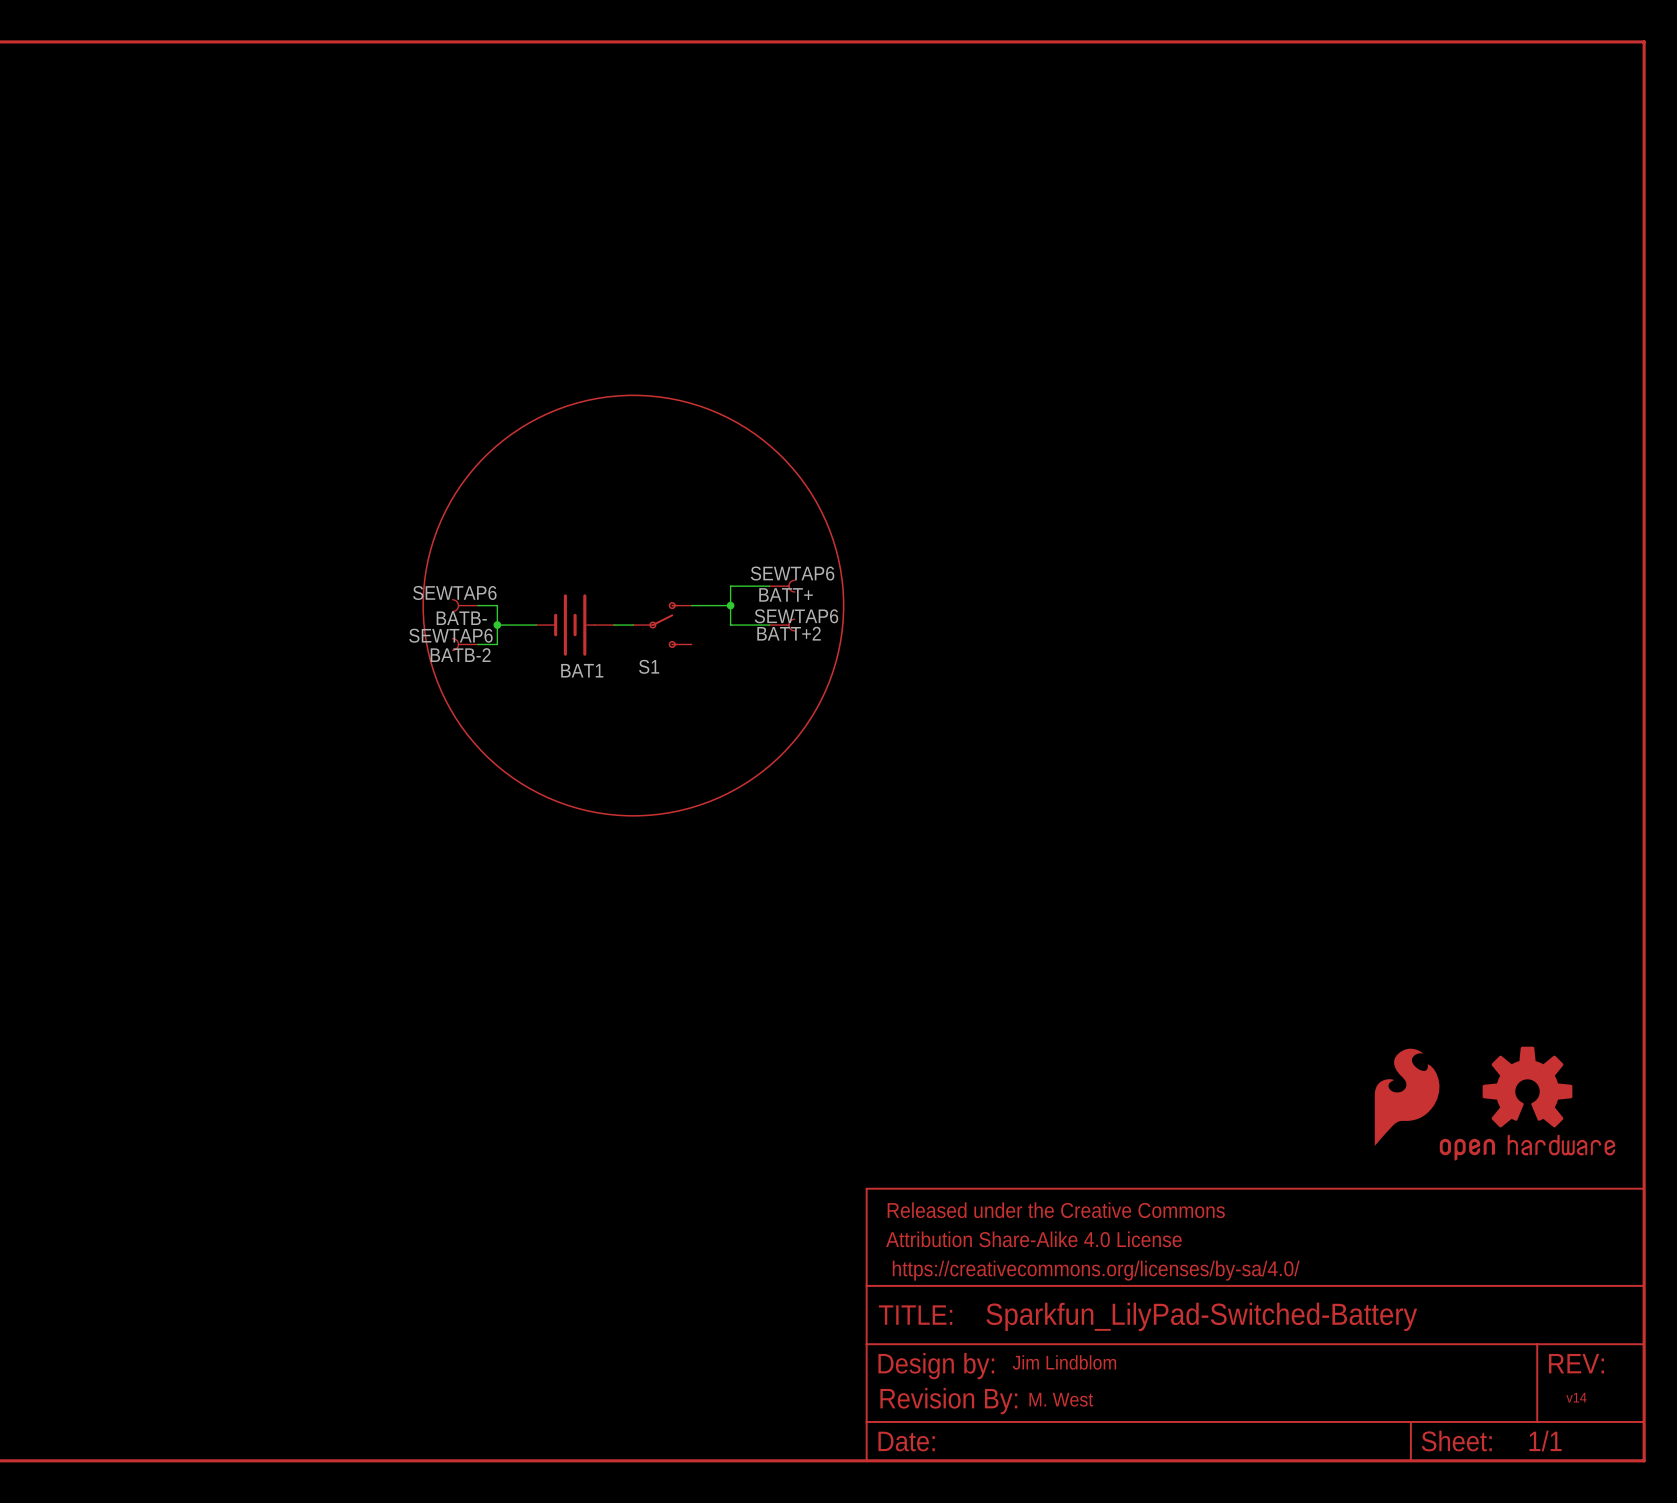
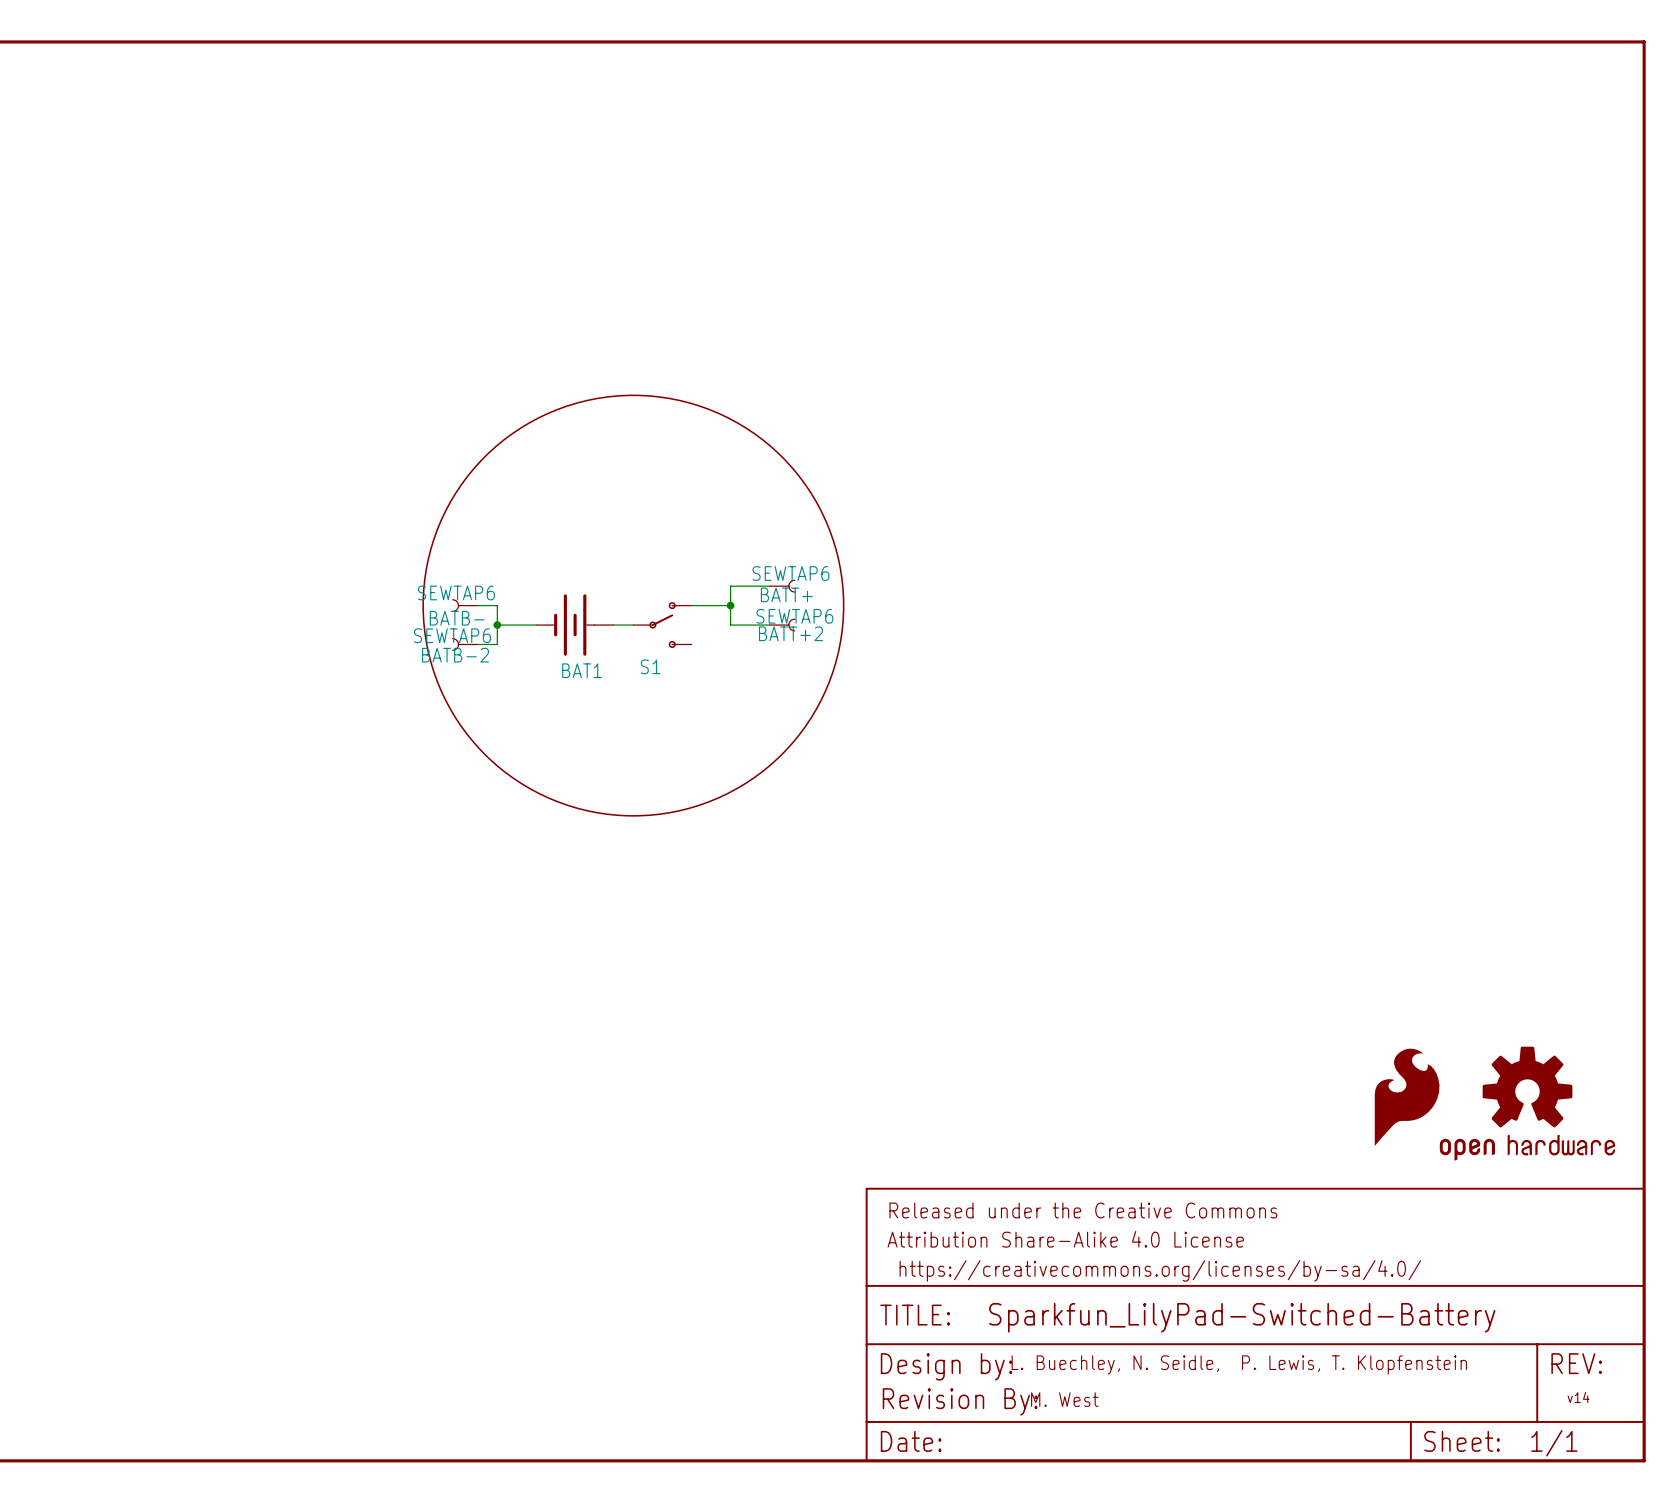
text: Jim Lindblom (1064, 1362) -> L. Buechley, N. Seidle, P. Lewis, T. Klopfenstein (1239, 1364)

